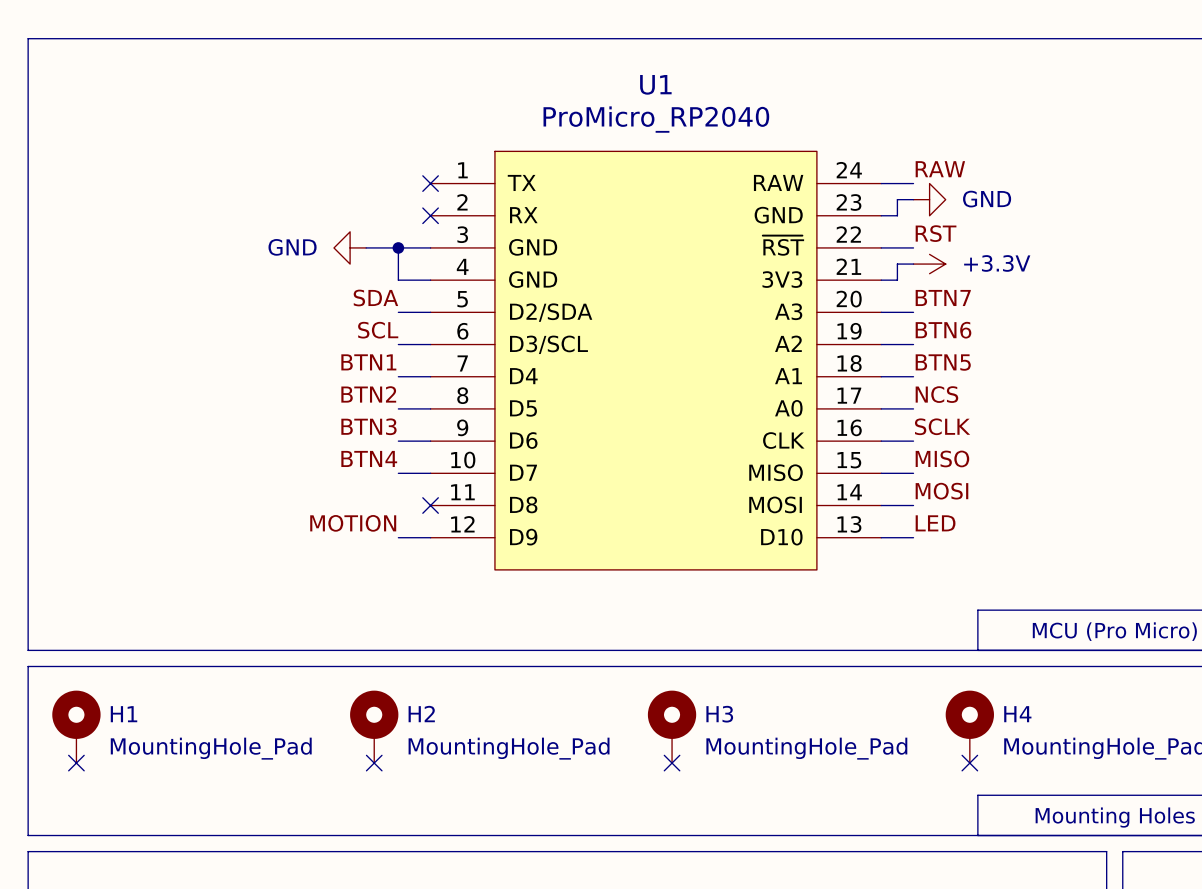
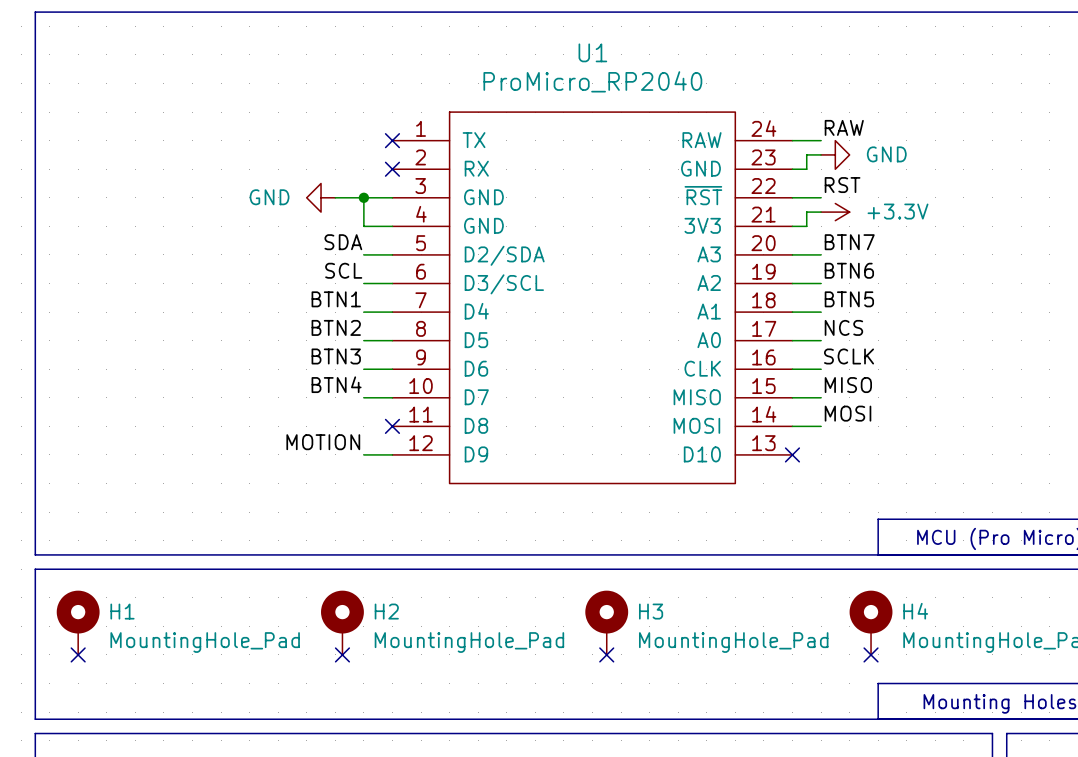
U1 symbol: [430, 151, 882, 570] -> [392, 112, 793, 484]
label: LED (935, 523) -> none
wire: (881, 537) (913, 537) -> none
no-connect mark: none -> (792, 454)

